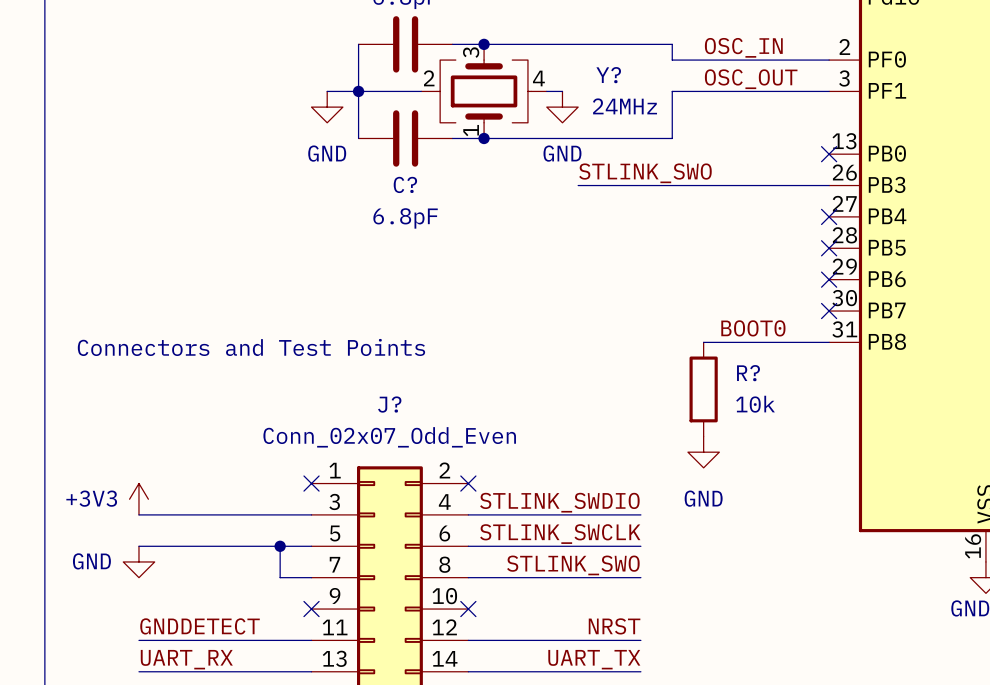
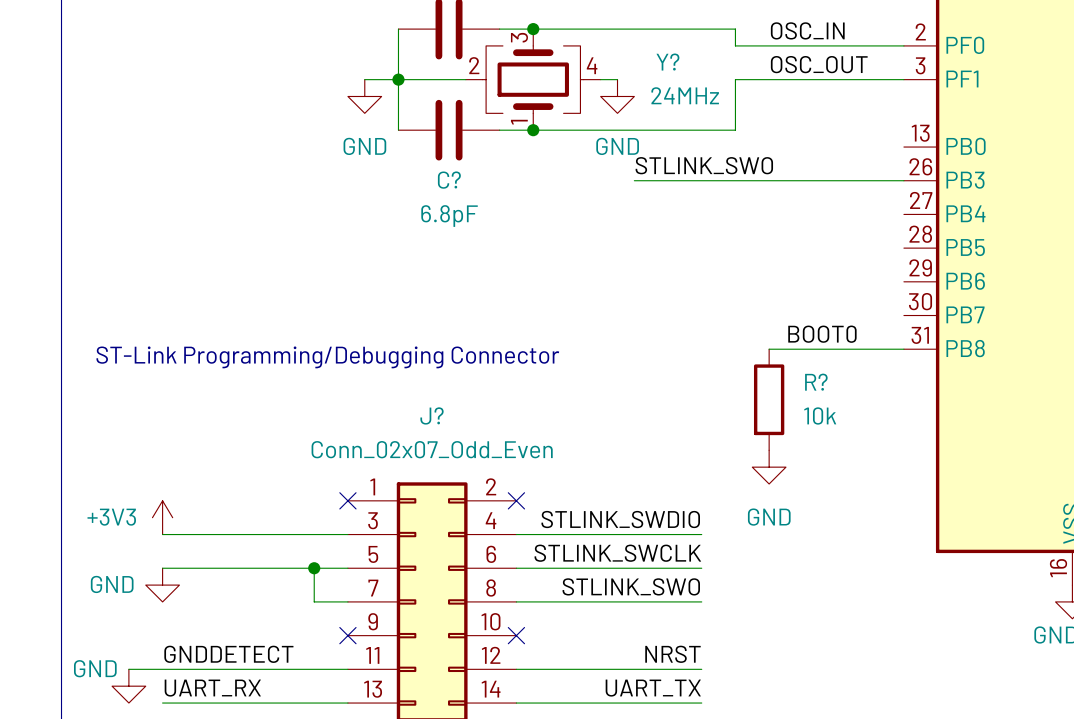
no-connect mark: (829, 154) -> none
no-connect mark: (829, 216) -> none
no-connect mark: (829, 248) -> none
no-connect mark: (829, 279) -> none
no-connect mark: (829, 311) -> none
text: Connectors and Test Points (251, 347) -> ST-Link Programming/Debugging Connector (327, 357)
wire: none -> (128, 669) (162, 669)
power symbol: none -> GND (128, 686)

